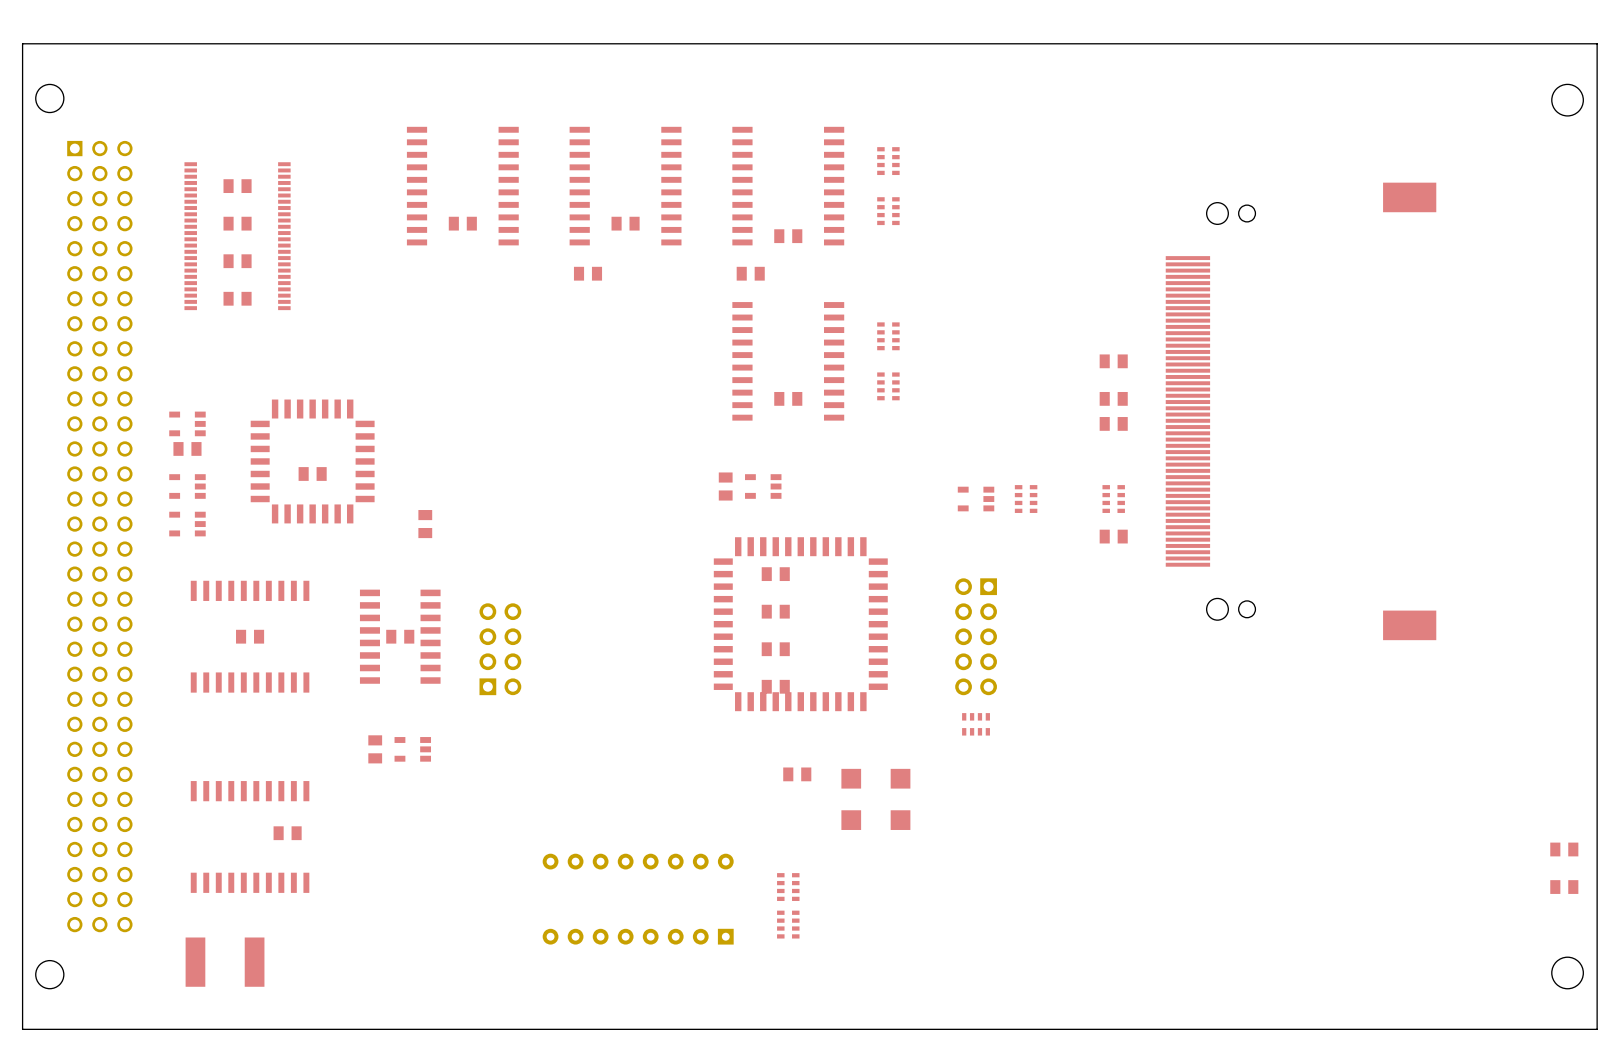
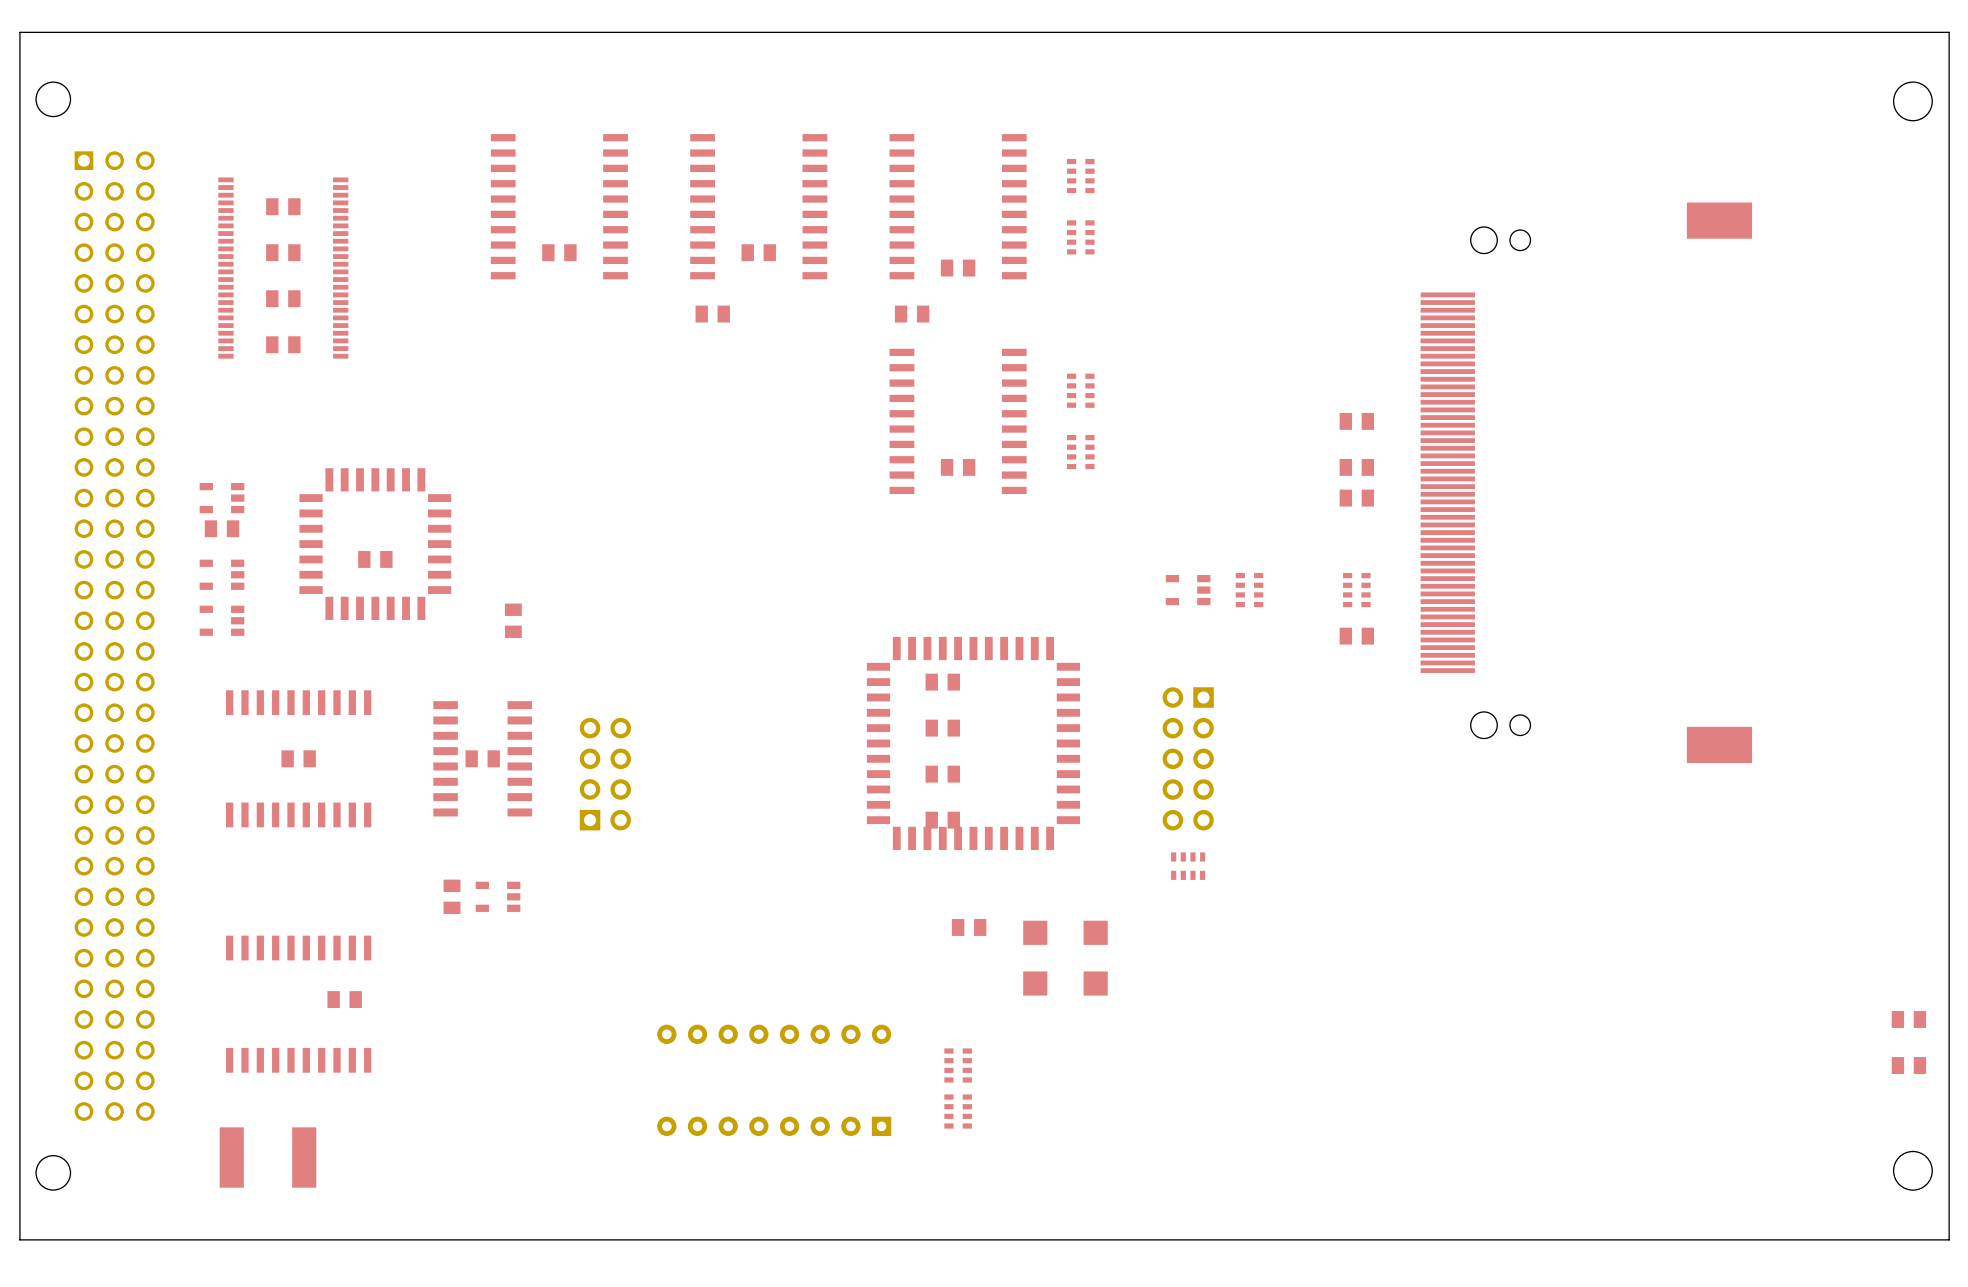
part: (725, 486) -> none
part: (763, 486) -> none

